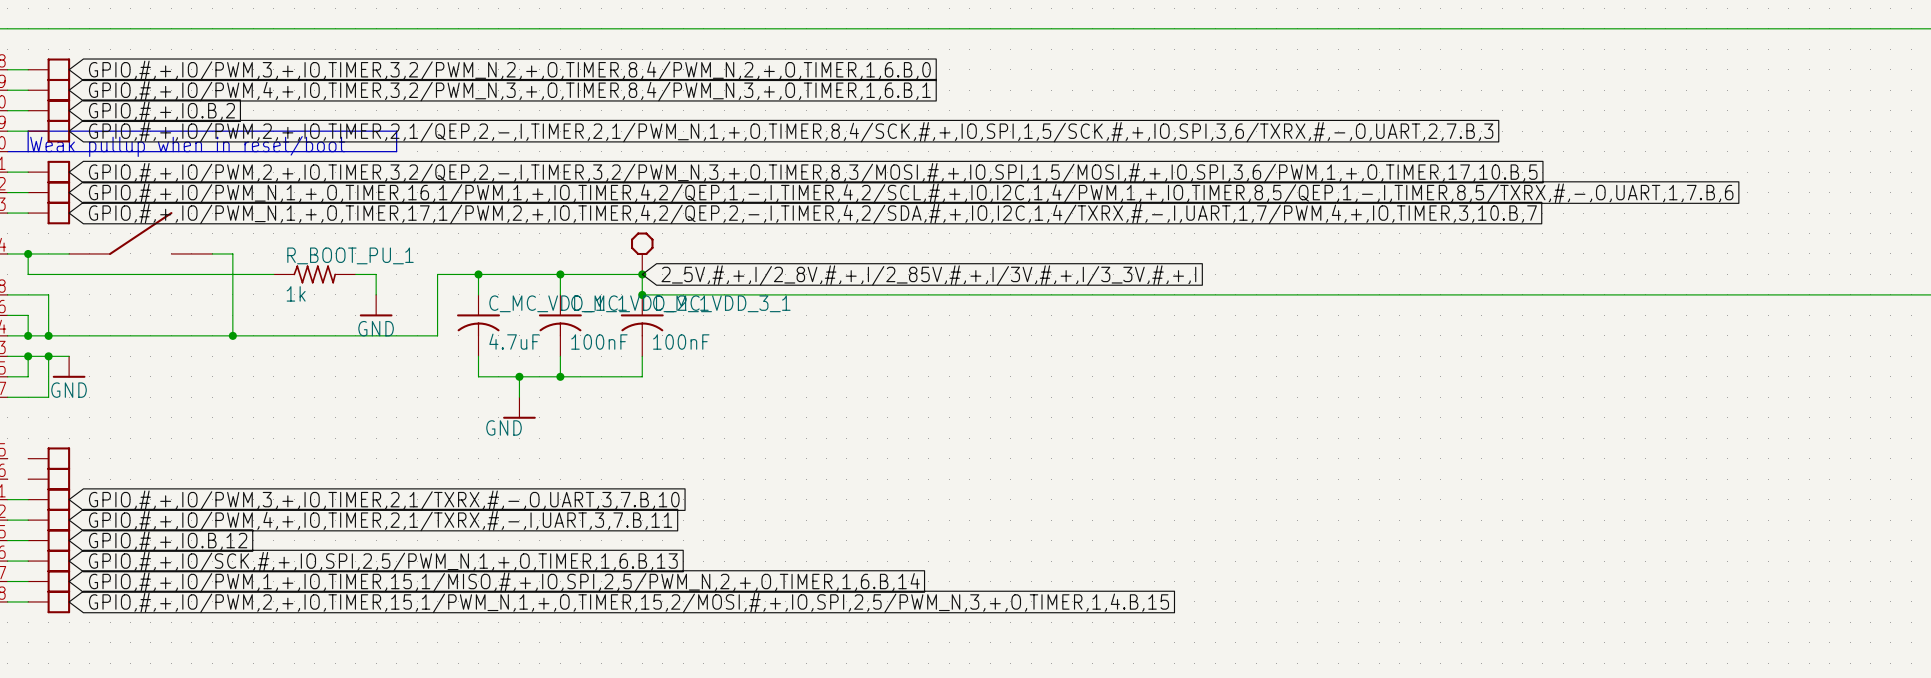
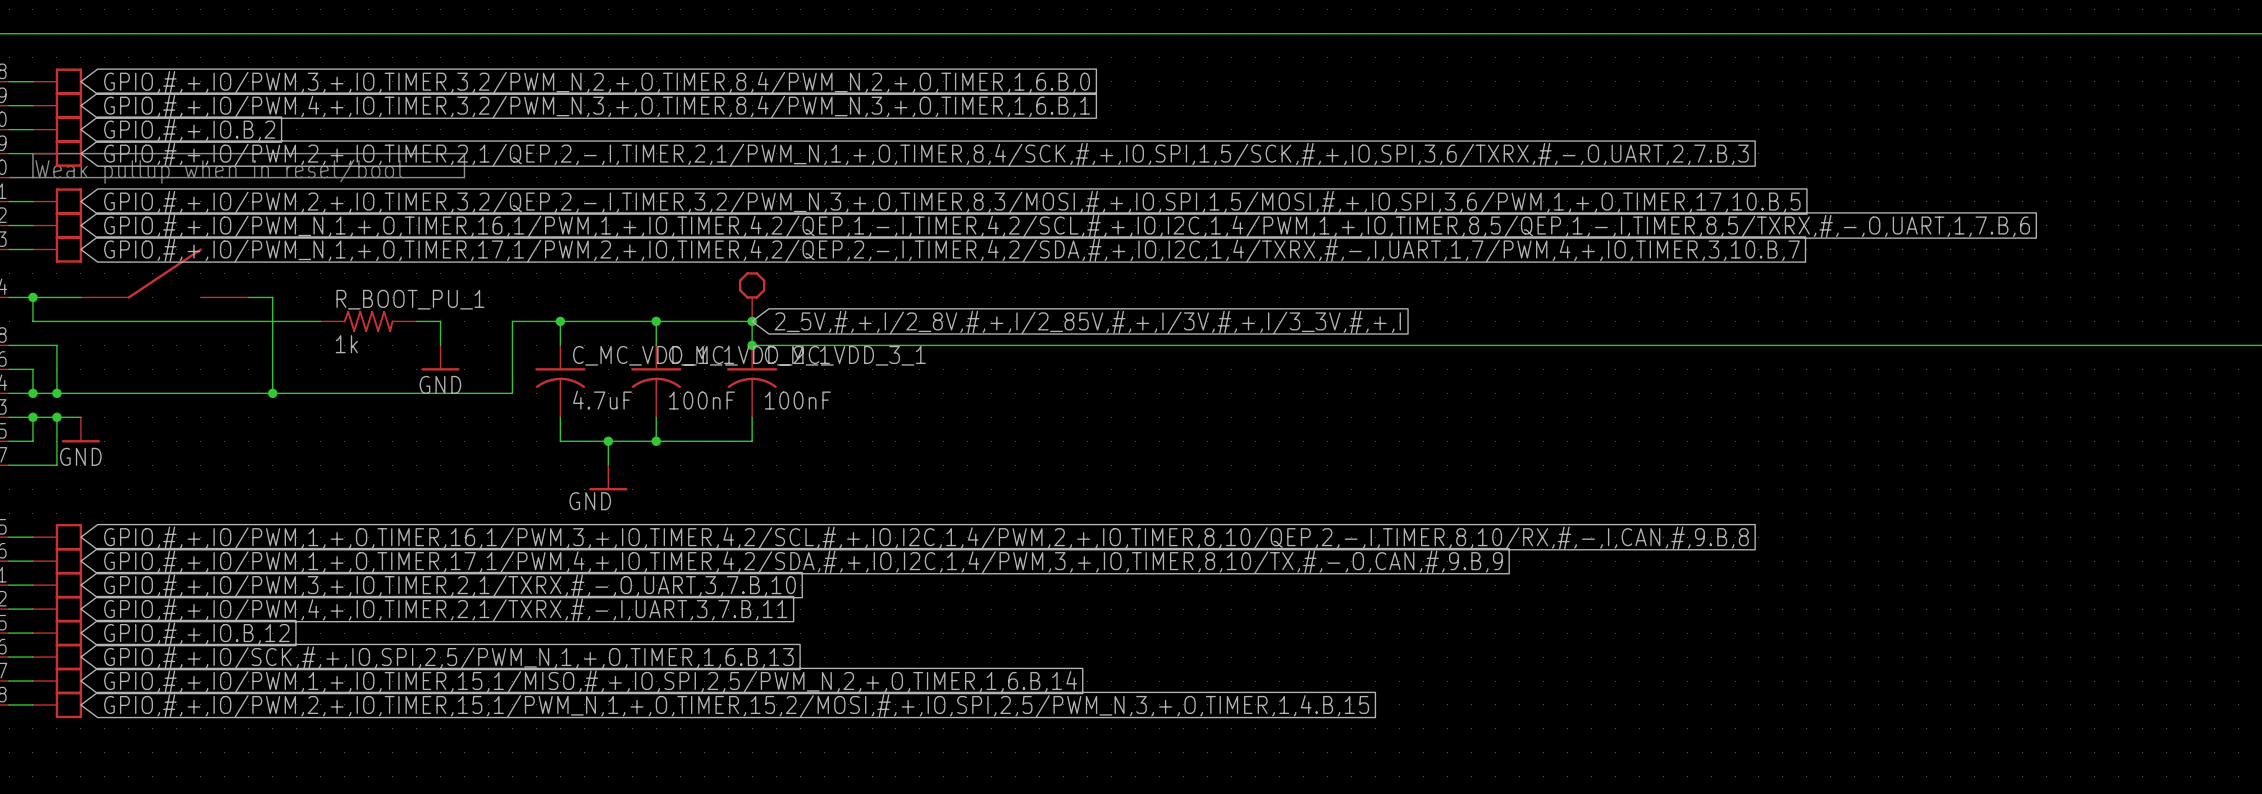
wire: none -> (9, 537) (32, 537)
global label: none -> GPIO,#,+,IO/PWM,1,+,O,TIMER,16,1/PWM,3,+,IO,TIMER,4,2/SCL,#,+,IO,I2C,1,4/PWM,2,+,IO,TIMER,8,10/QEP,2,-,I,TIMER,8,10/RX,#,-,I,CAN,#,9.B,8 (926, 538)
wire: none -> (9, 561) (32, 561)
global label: none -> GPIO,#,+,IO/PWM,1,+,O,TIMER,17,1/PWM,4,+,IO,TIMER,4,2/SDA,#,+,IO,I2C,1,4/PWM,3,+,IO,TIMER,8,10/TX,#,-,O,CAN,#,9.B,9 (803, 562)

